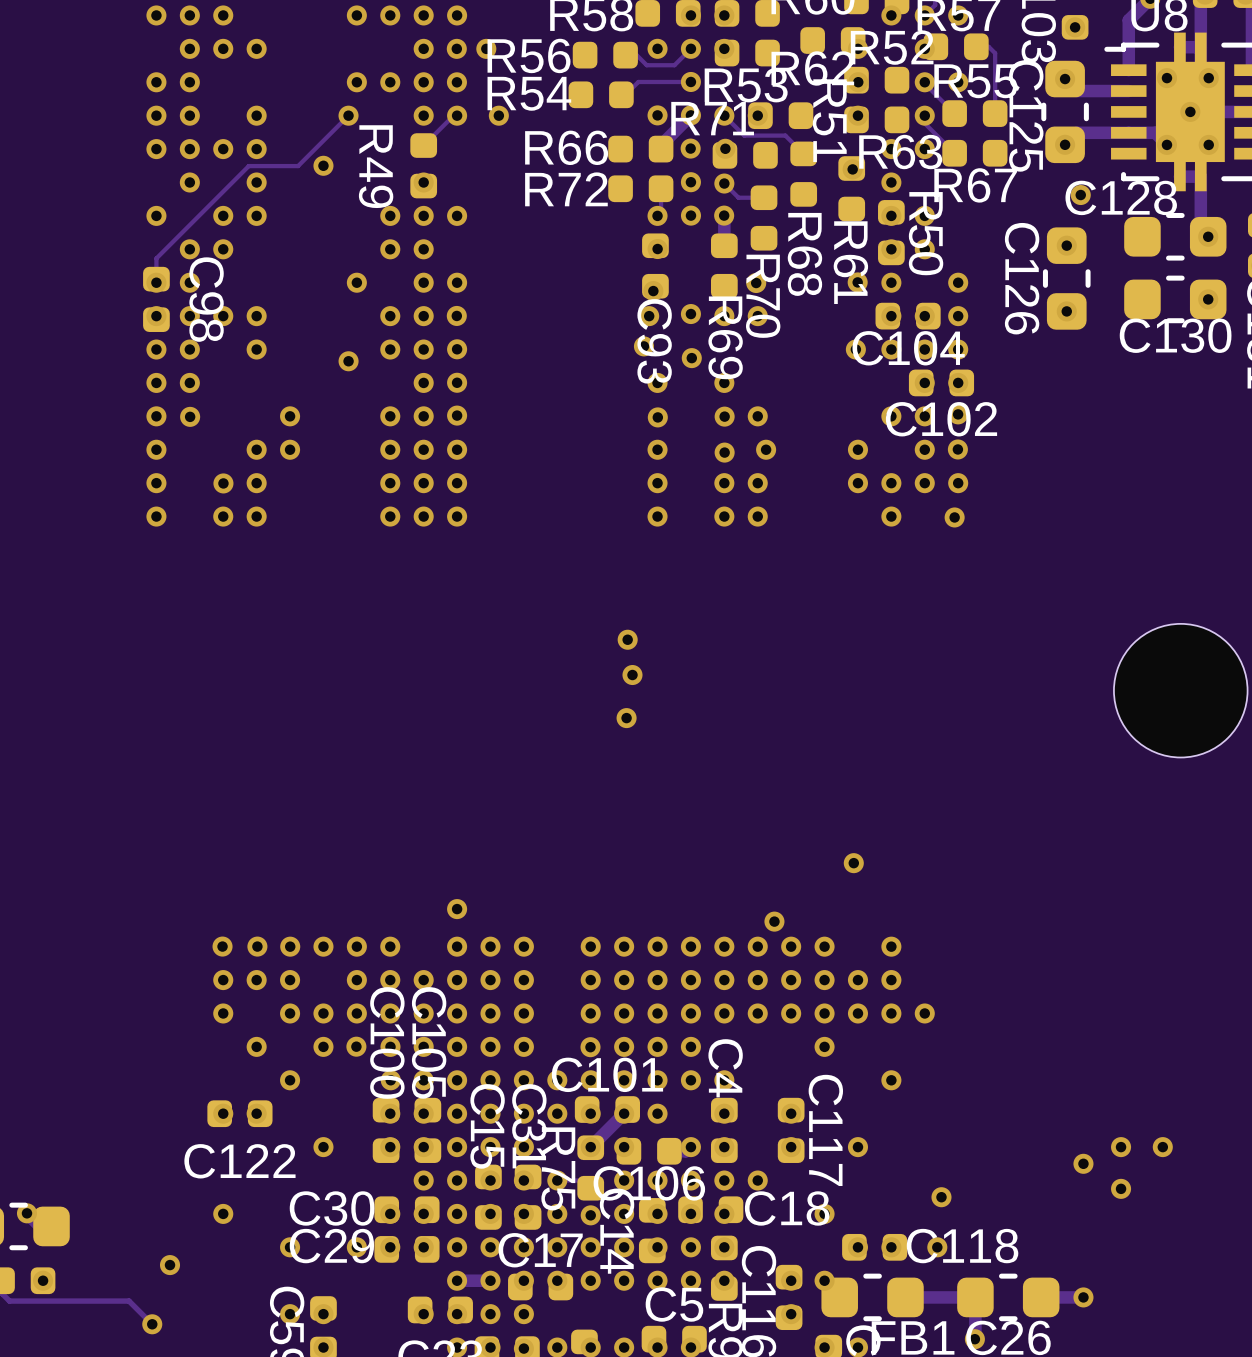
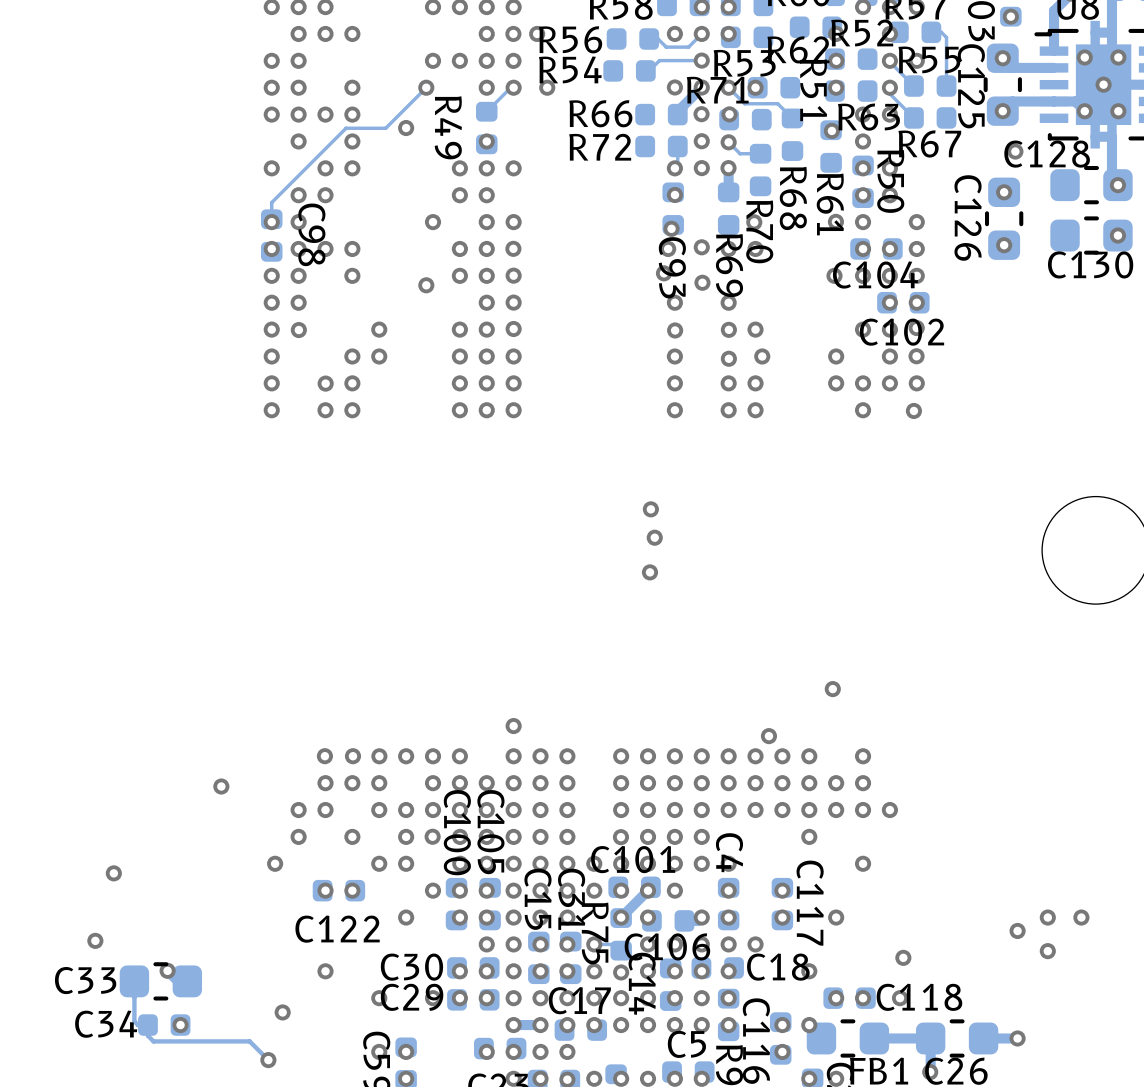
via: none -> (221, 786)
via: none -> (298, 810)
via: none -> (298, 836)
via: none -> (275, 863)
via: none -> (406, 863)
via: none -> (433, 890)

